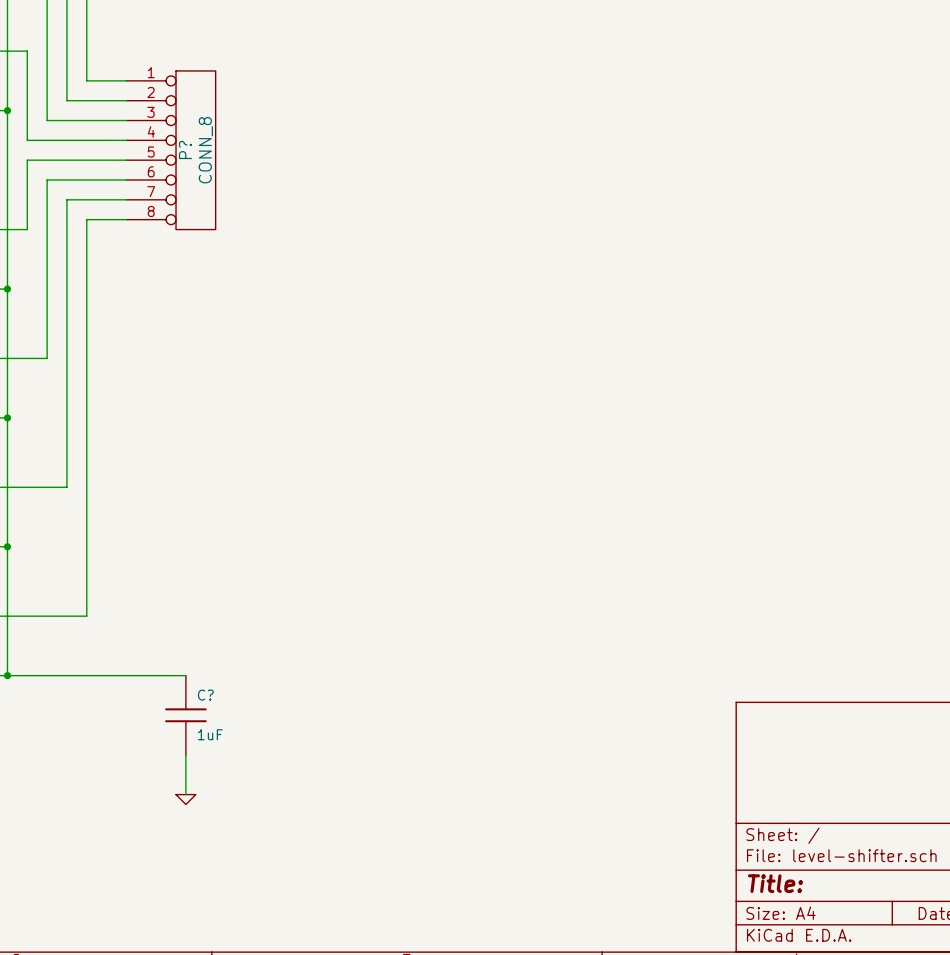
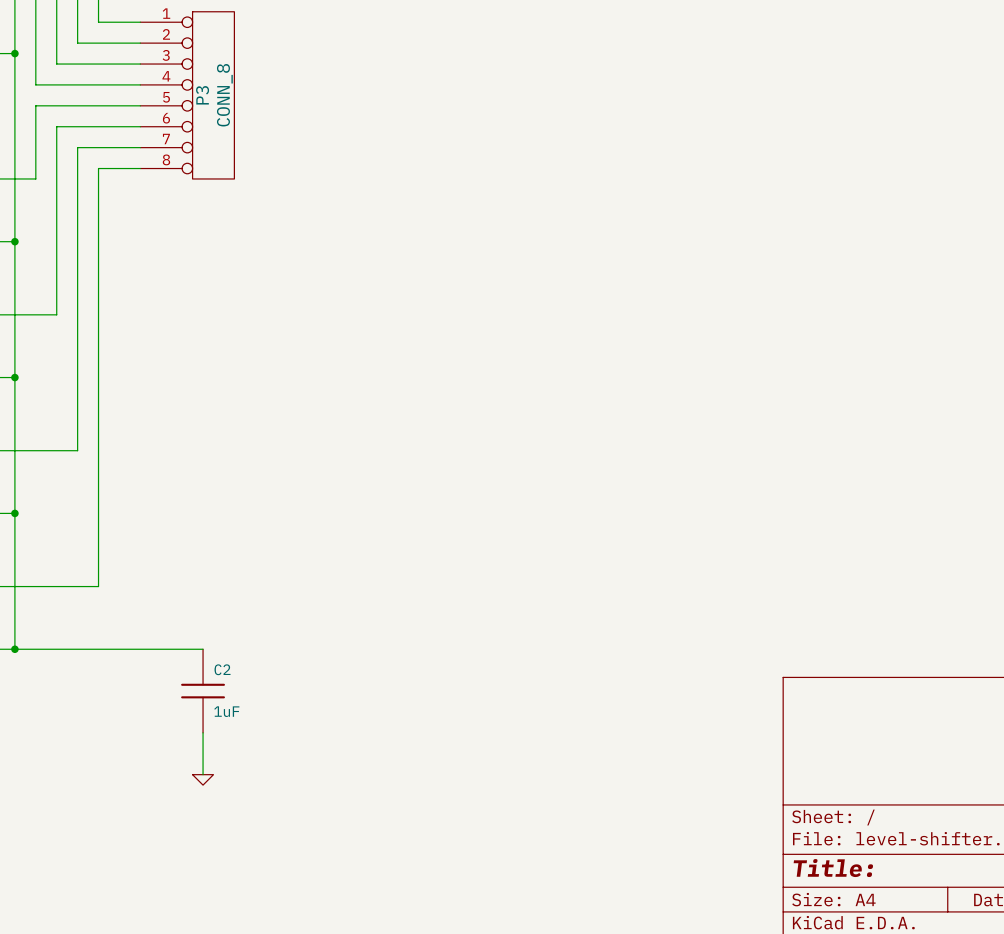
P? name: P? (185, 149) -> P3 (202, 95)
C? name: C? (205, 695) -> C2 (222, 669)

